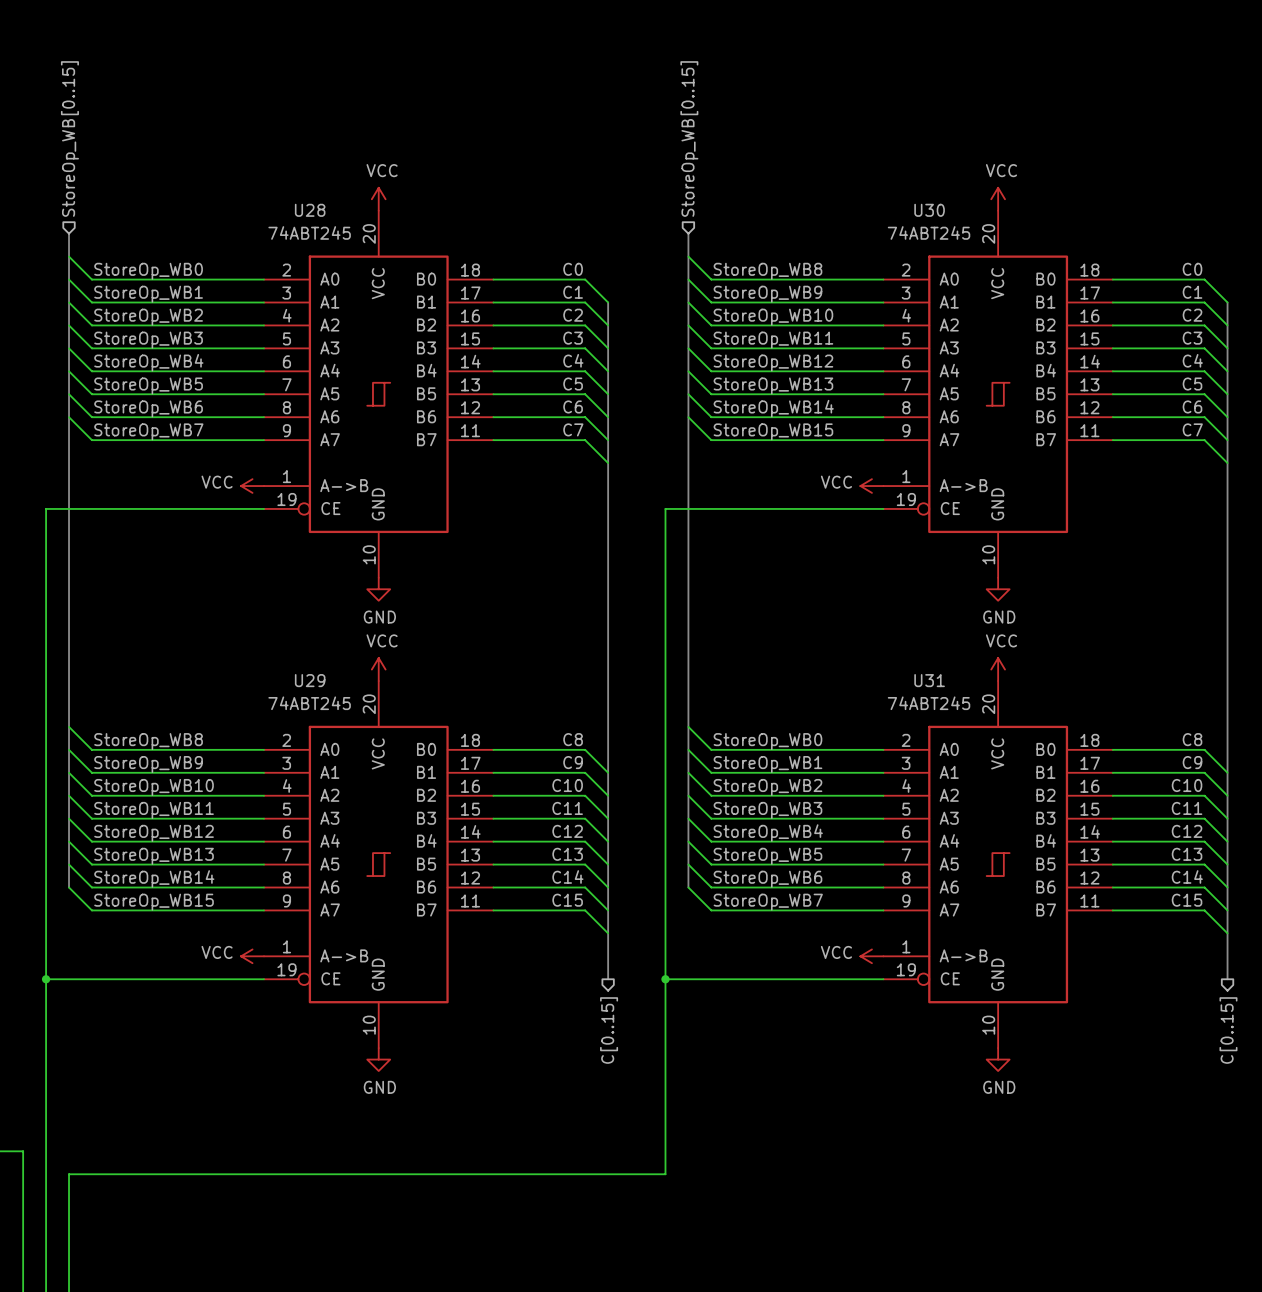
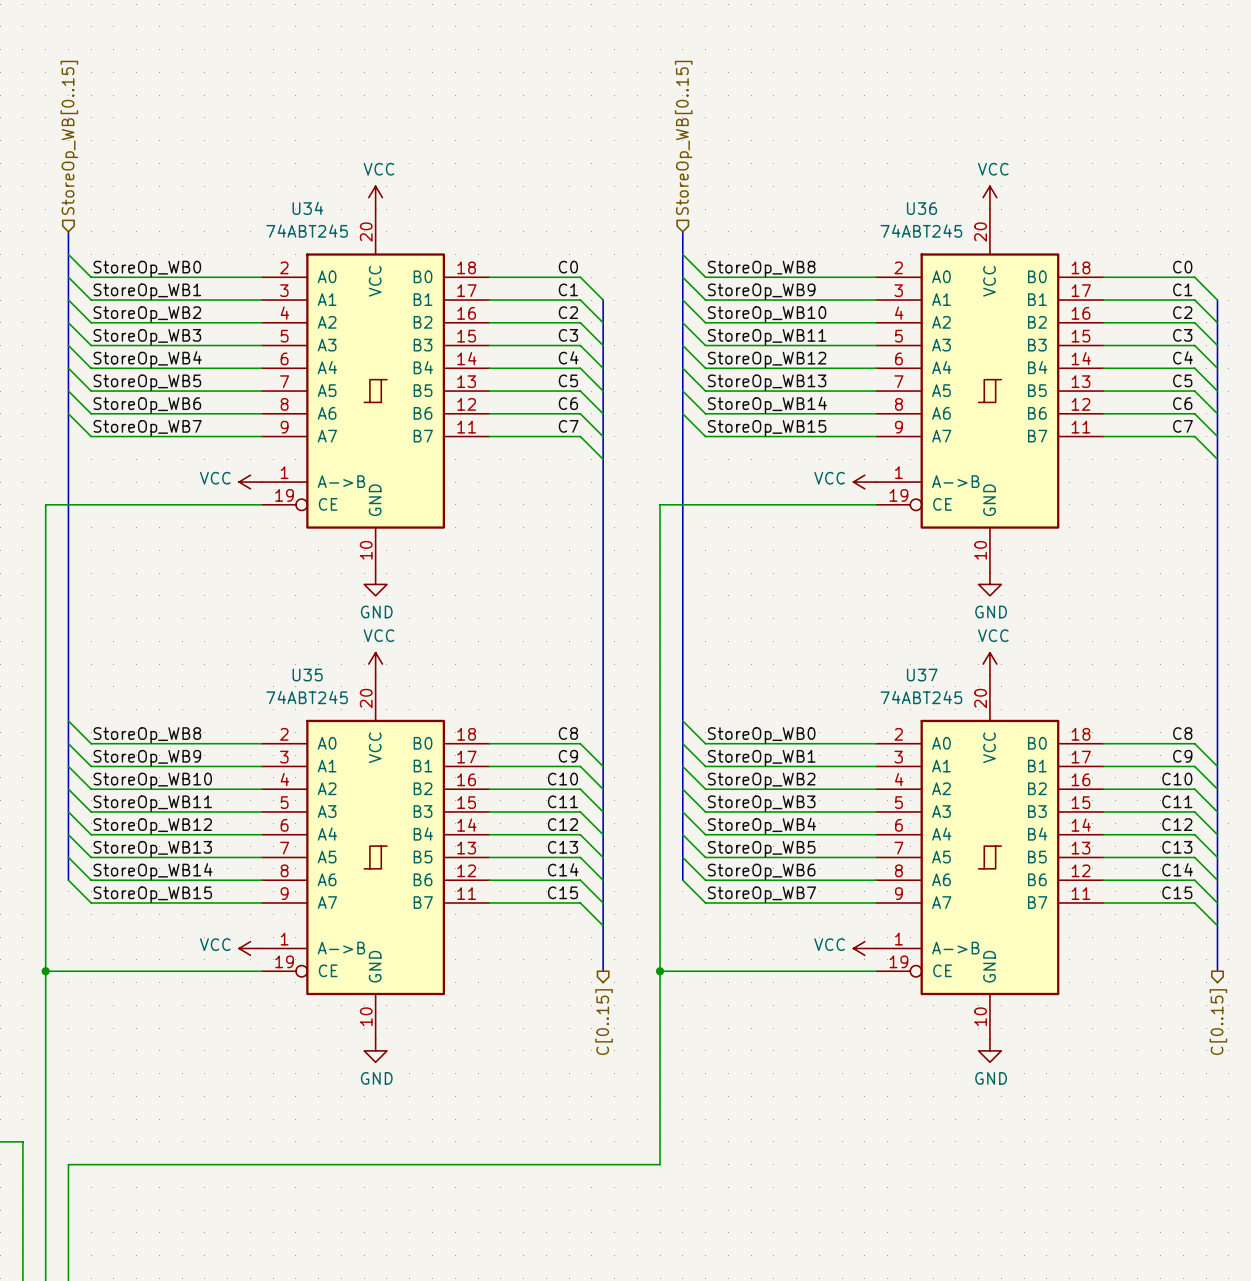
U28 name: U28 (310, 210) -> U34 (307, 208)
U30 name: U30 (929, 210) -> U36 (921, 208)
U29 name: U29 (310, 680) -> U35 (307, 675)
U31 name: U31 (929, 680) -> U37 (922, 675)

